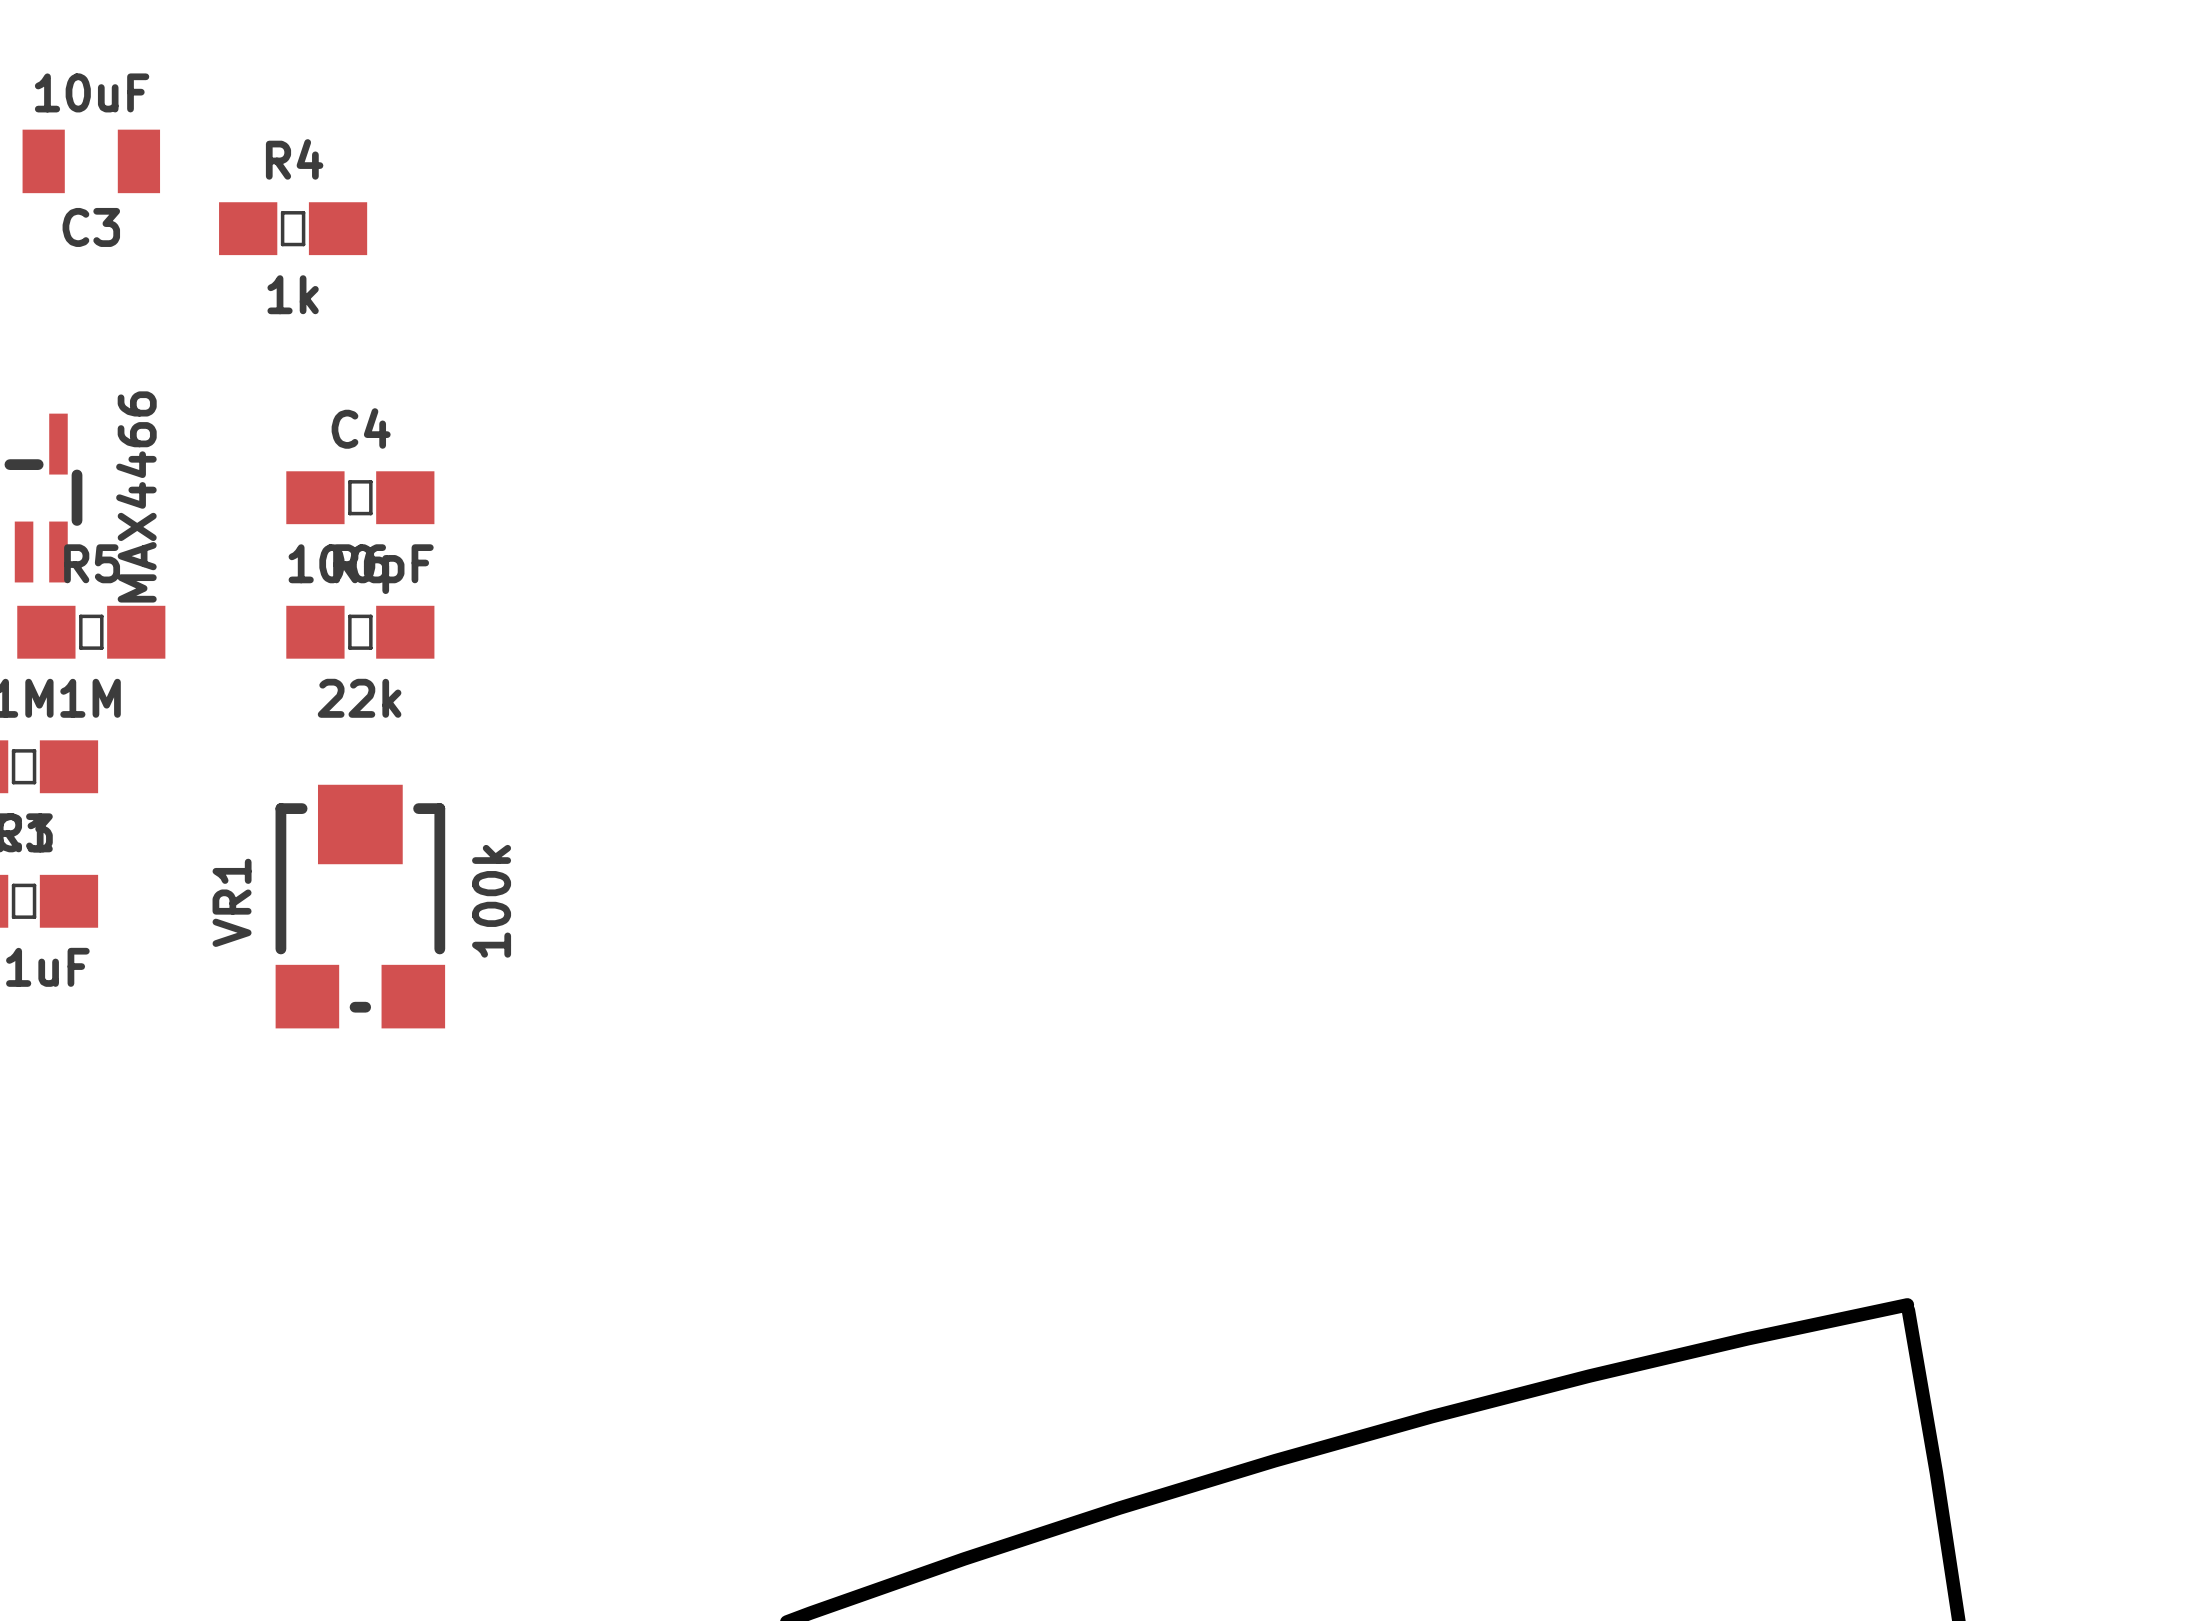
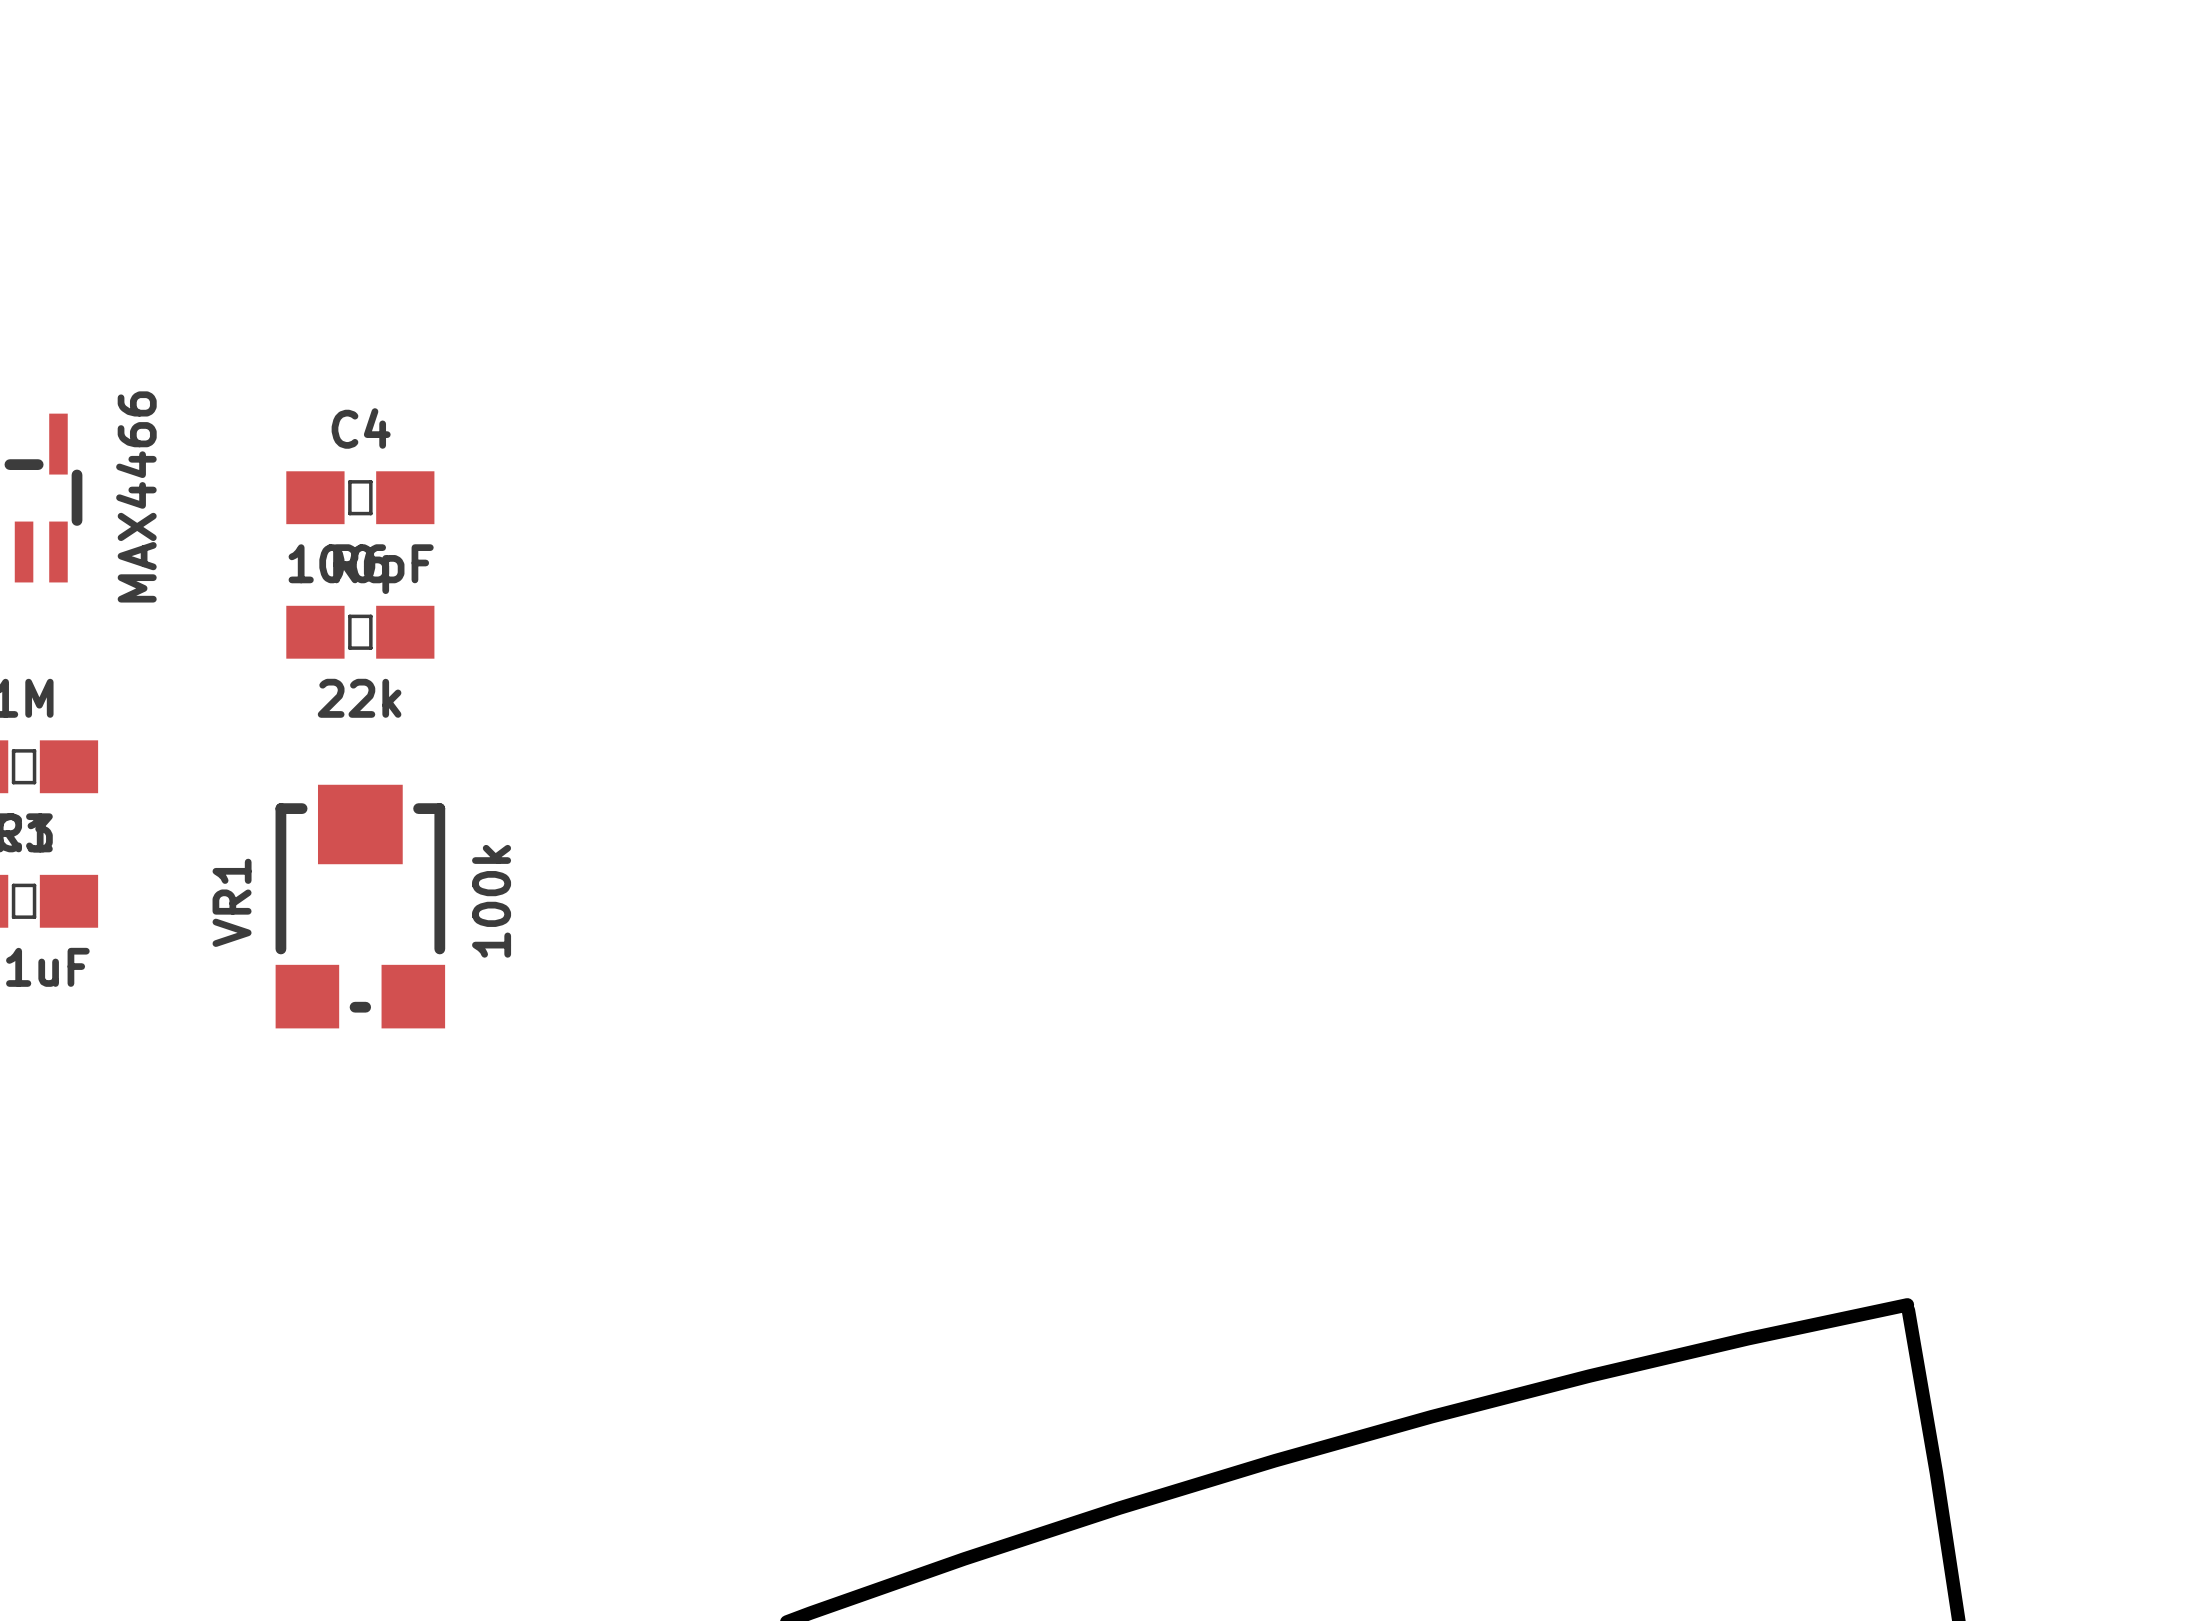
C3: 10uF (91, 161) -> none
R4: 1k (293, 228) -> none
R5: 1M (91, 632) -> none

